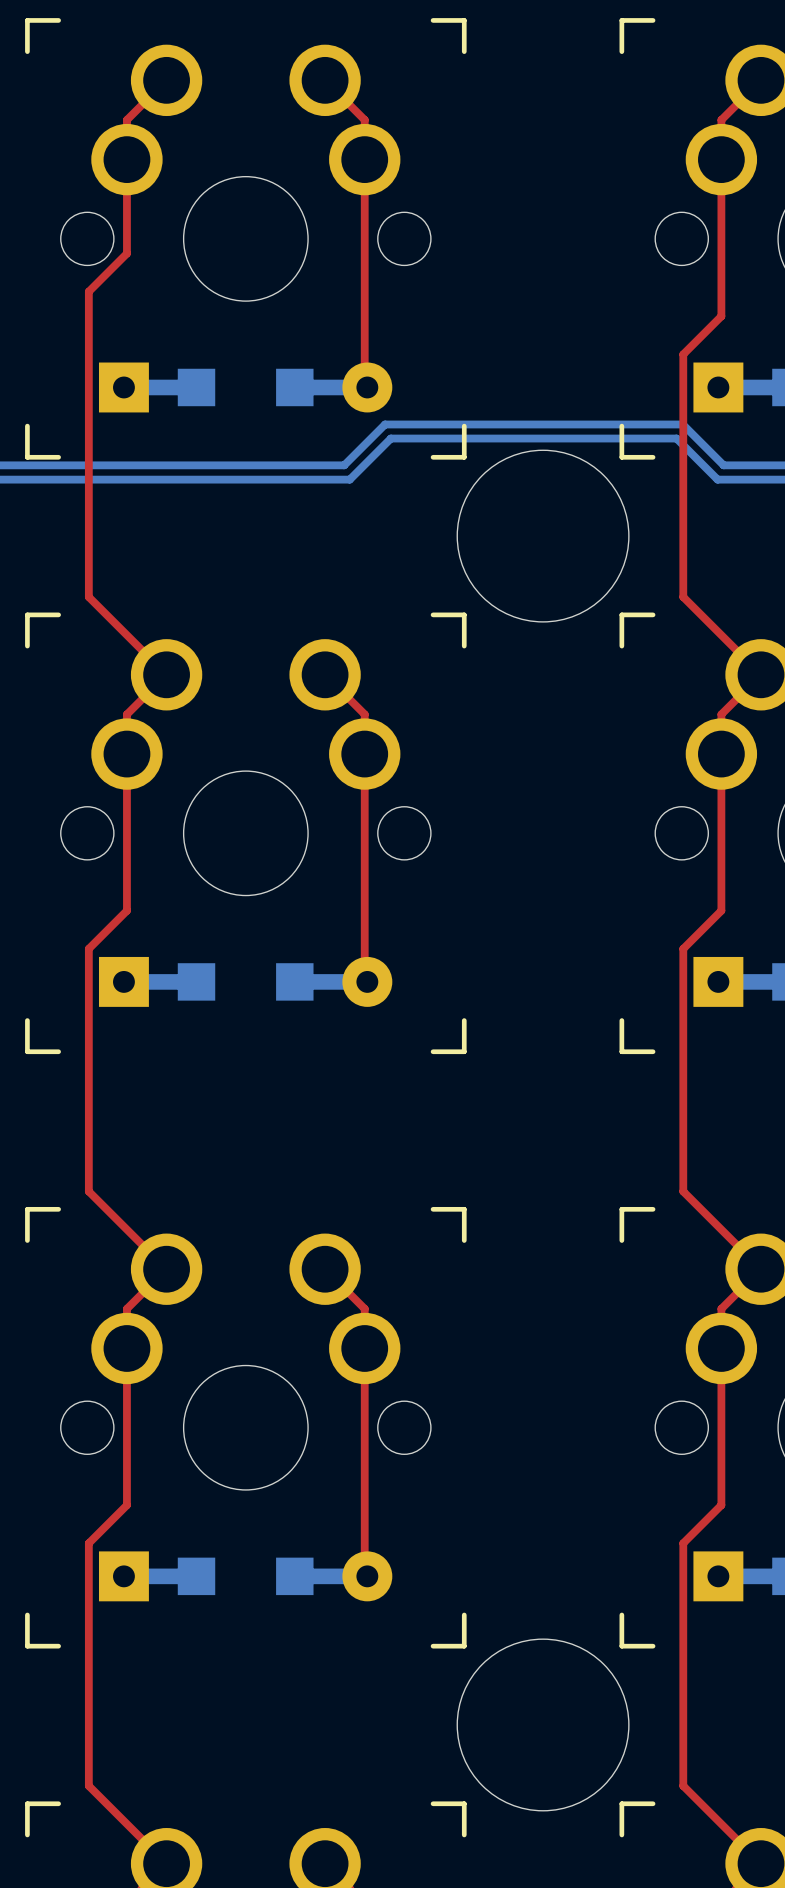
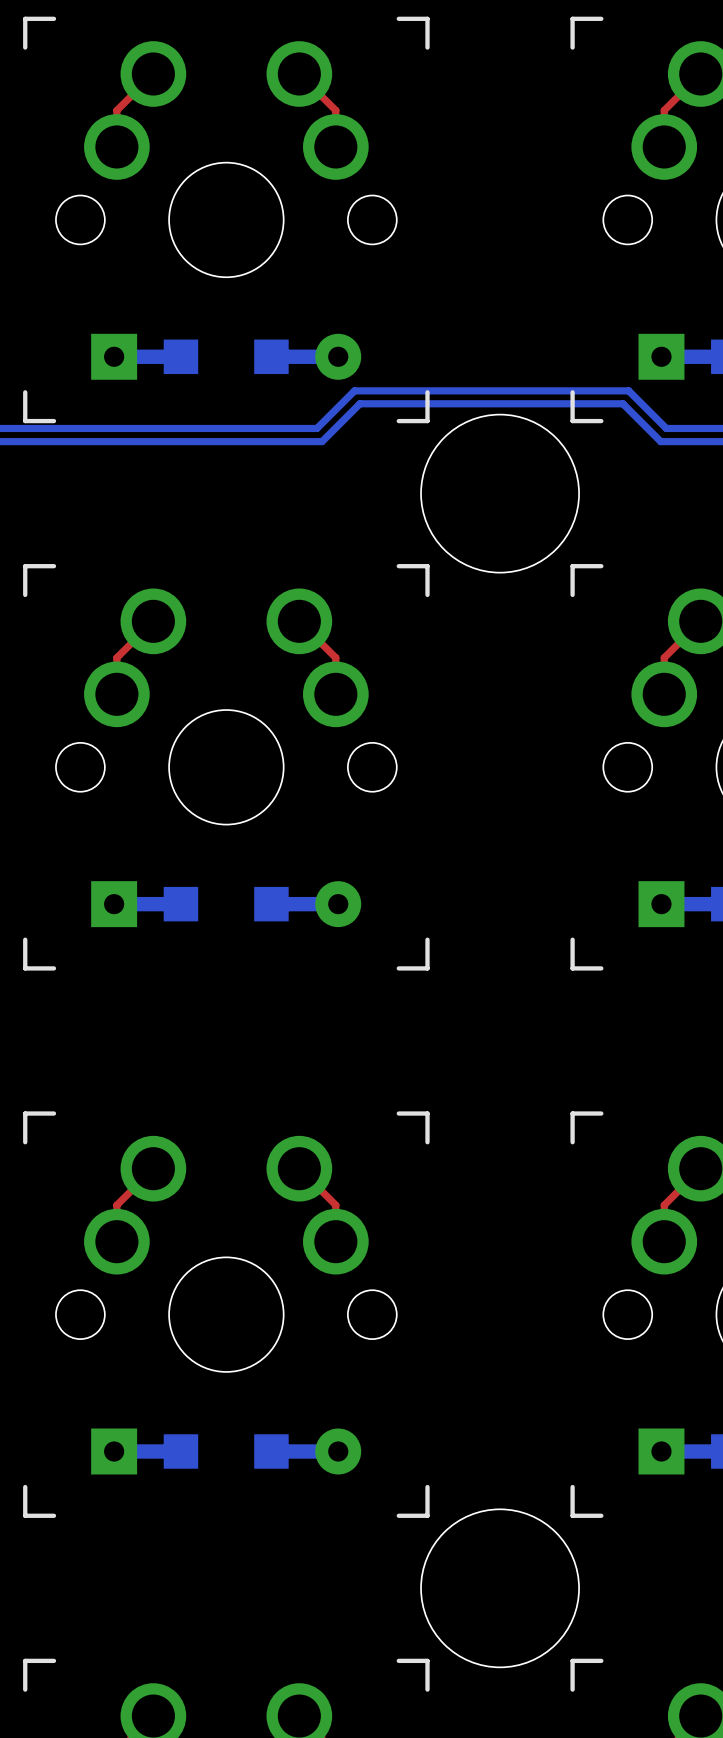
top track: (126, 159) (126, 253) (88, 291) (88, 597) (166, 674) -> none
top track: (364, 159) (364, 384) (367, 387) -> none
top track: (721, 159) (721, 316) (683, 354) (683, 597) (761, 674) -> none
top track: (126, 754) (126, 910) (88, 948) (88, 1191) (166, 1269) -> none
top track: (364, 754) (364, 979) (367, 981) -> none
top track: (721, 754) (721, 910) (683, 948) (683, 1191) (761, 1269) -> none
top track: (126, 1348) (126, 1505) (88, 1543) (88, 1785) (166, 1863) -> none
top track: (364, 1348) (364, 1573) (367, 1576) -> none
top track: (721, 1348) (721, 1505) (683, 1543) (683, 1785) (761, 1863) -> none

